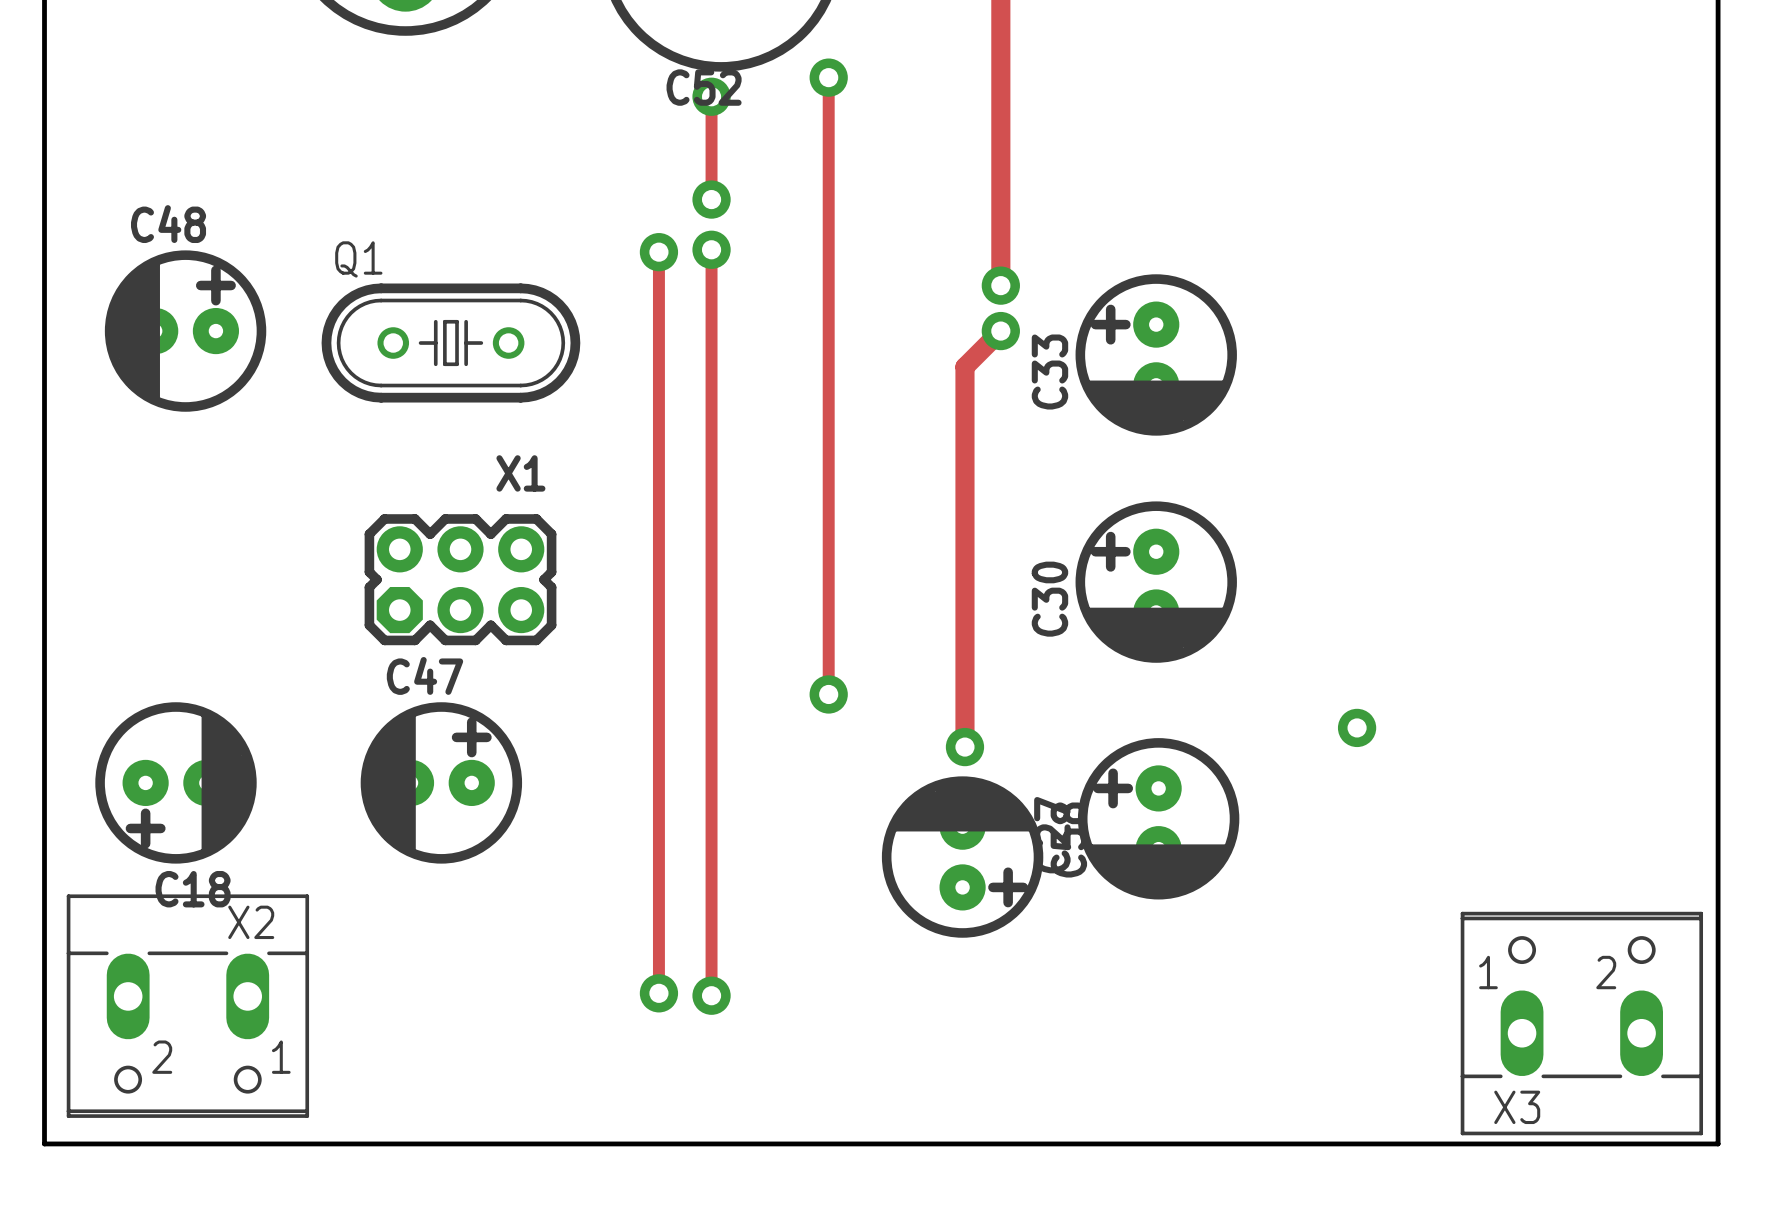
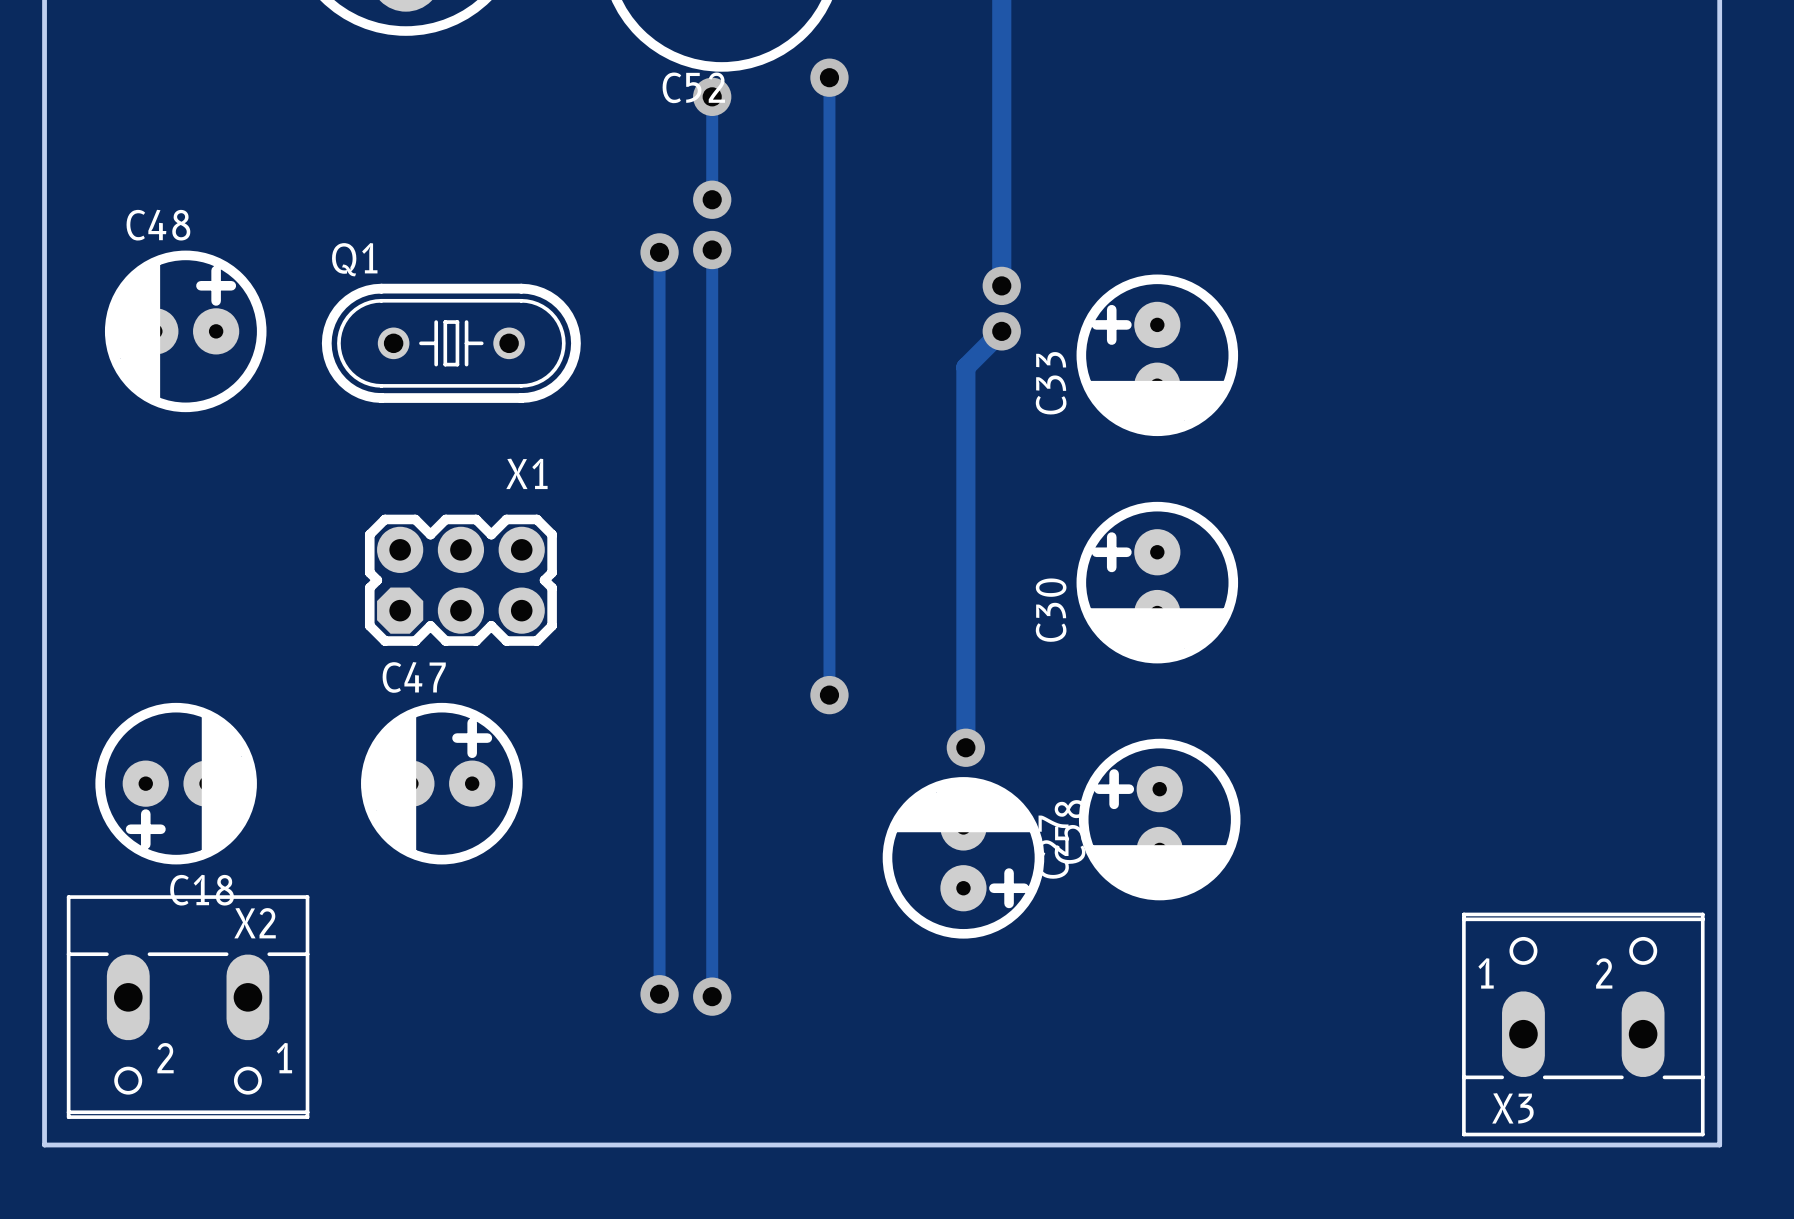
via: (1357, 727) -> none

